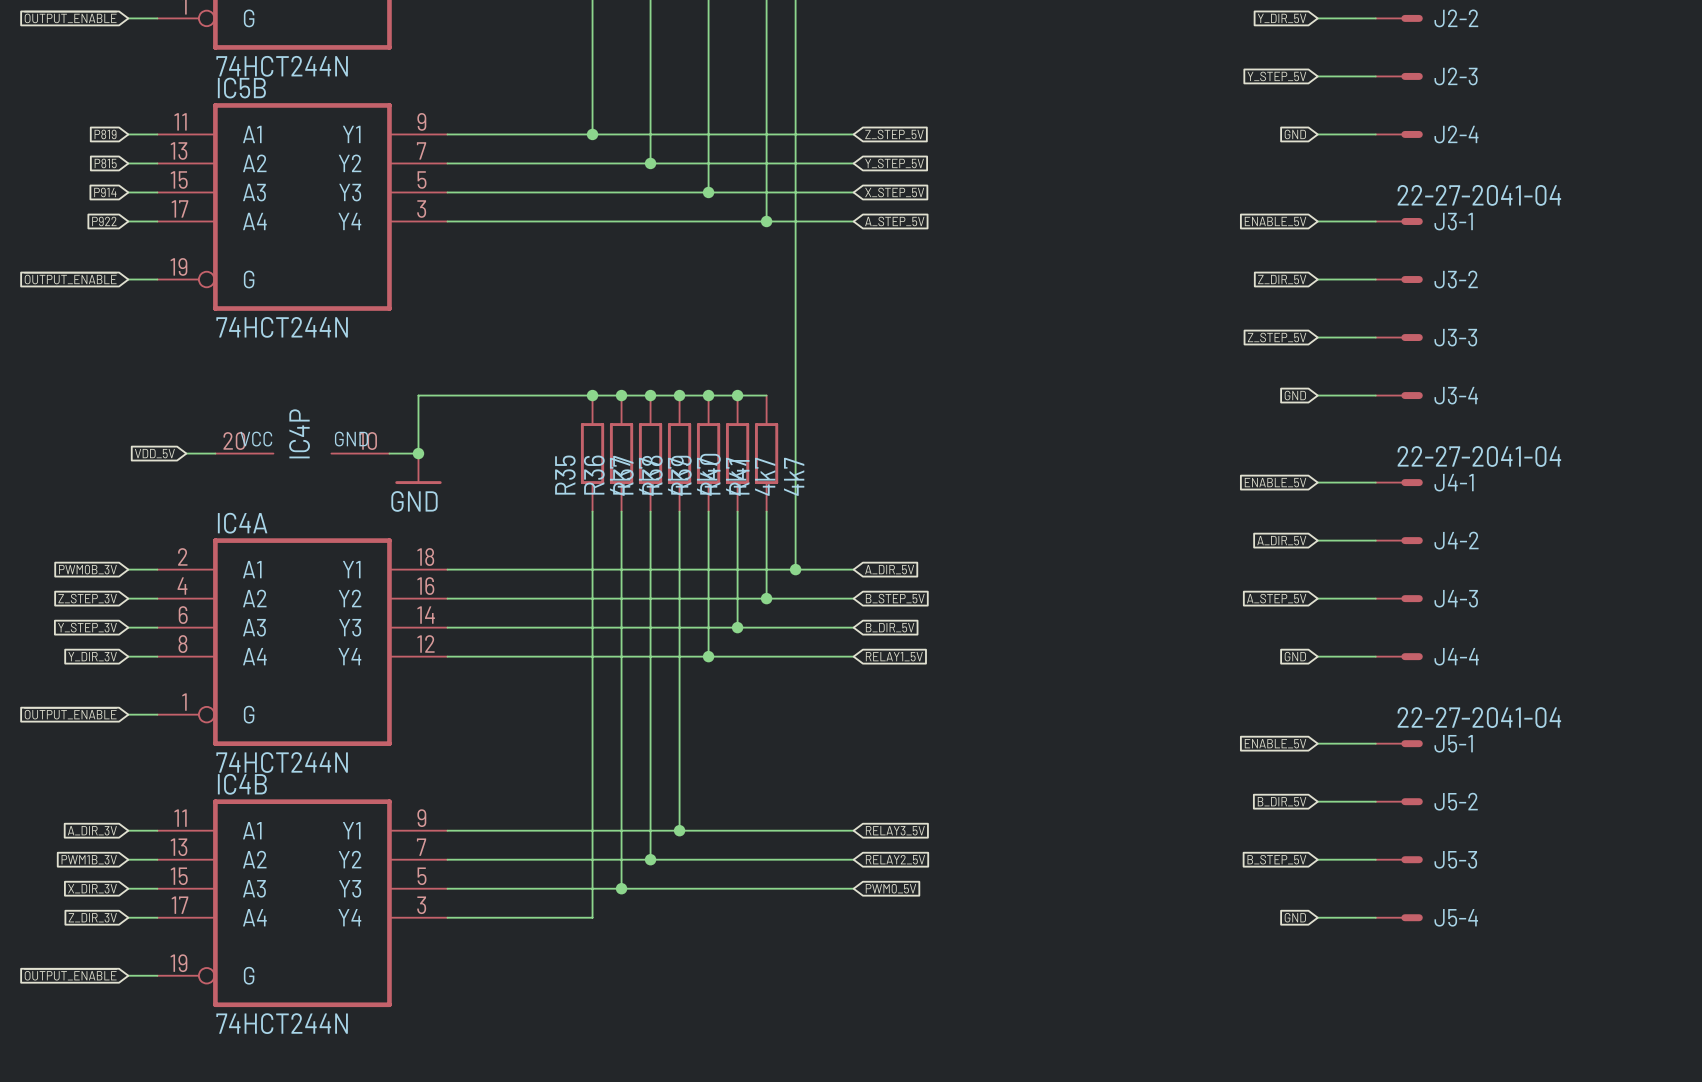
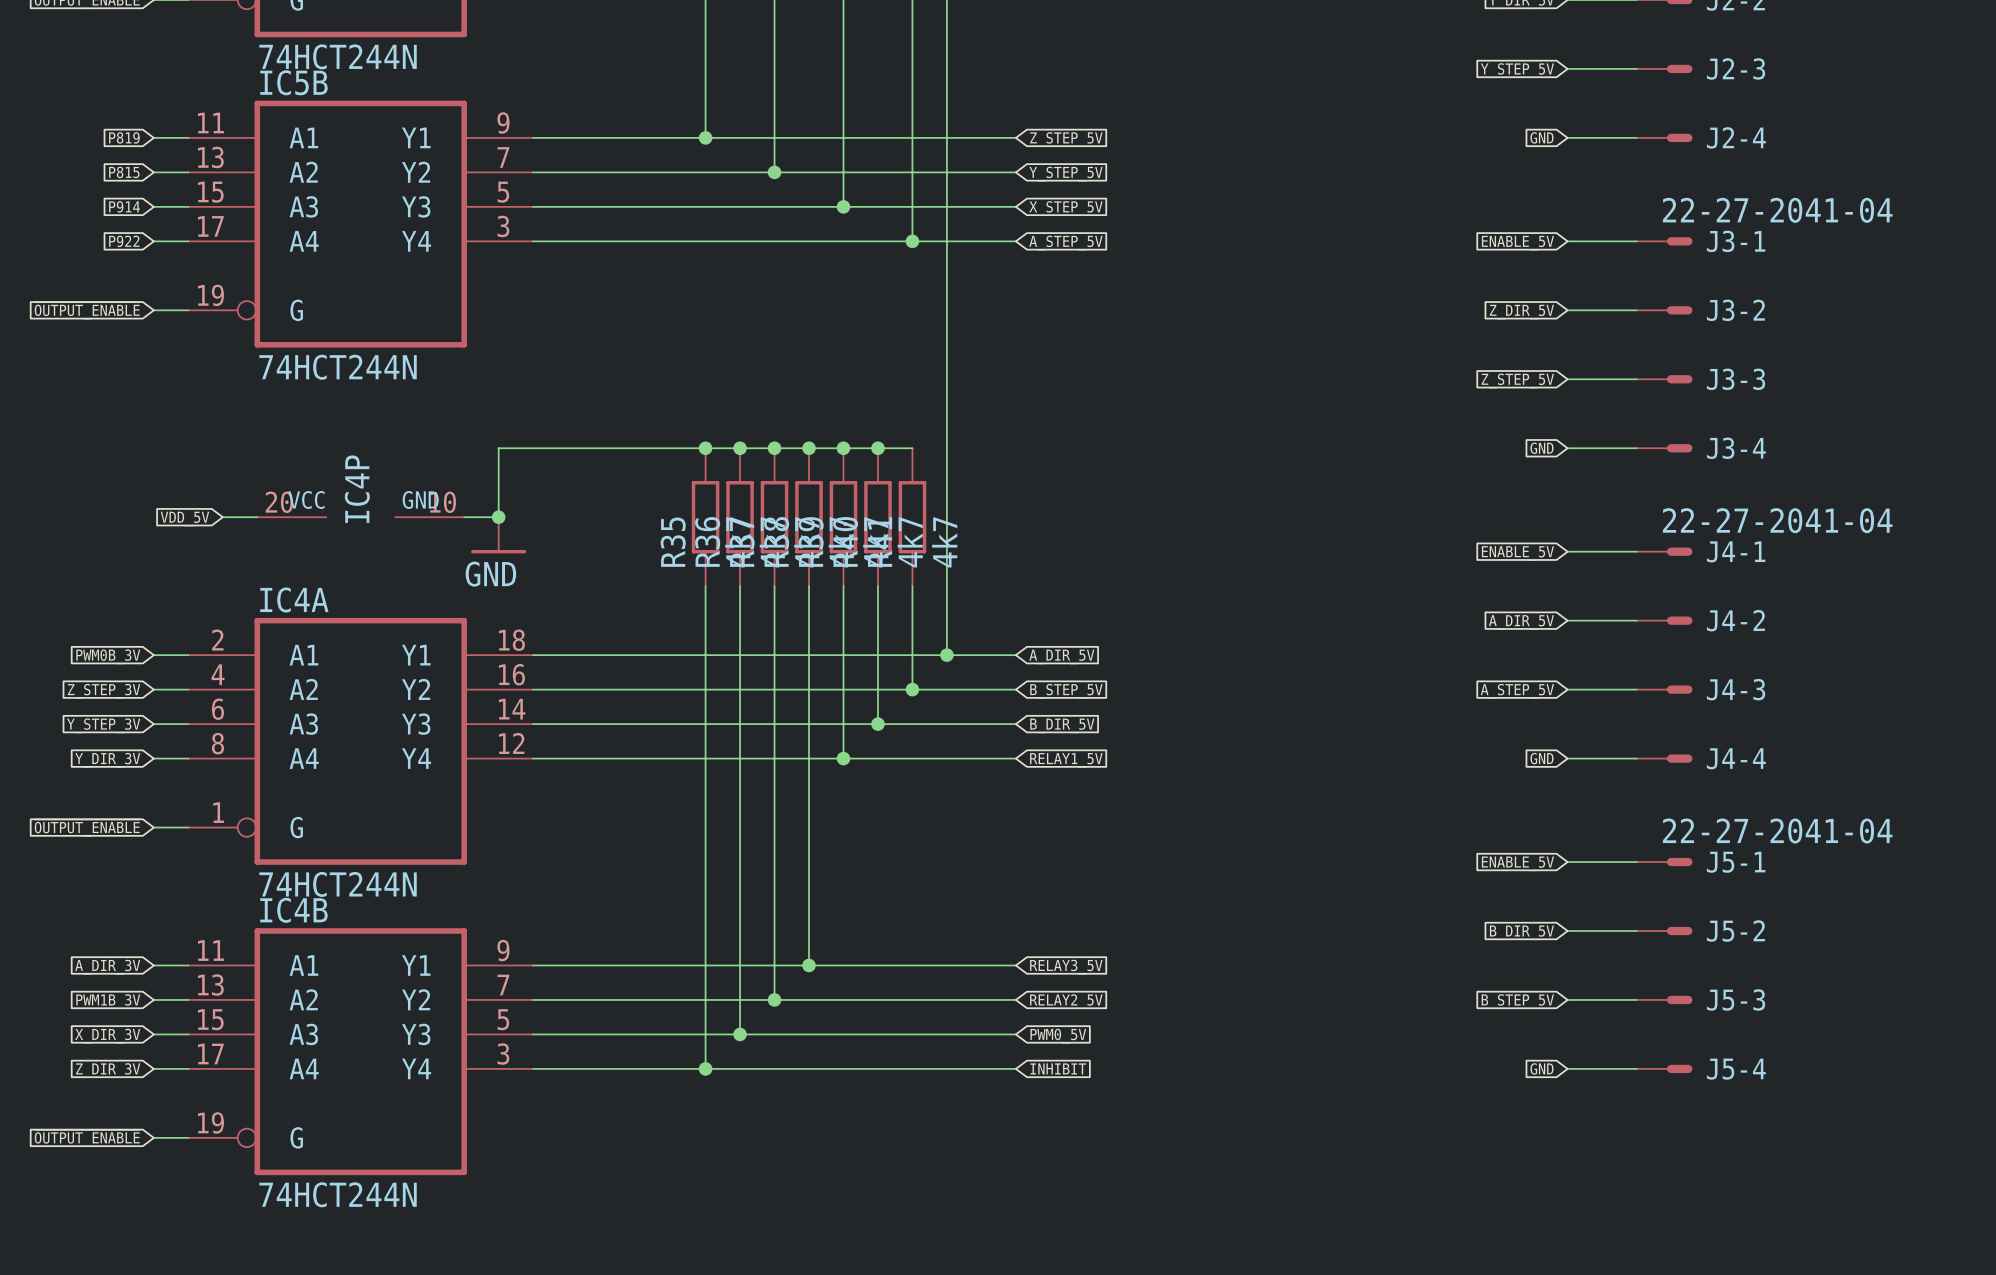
wire: none -> (705, 1068) (1015, 1068)
junction: none -> (705, 1068)
global label: none -> INHIBIT (1058, 1068)

